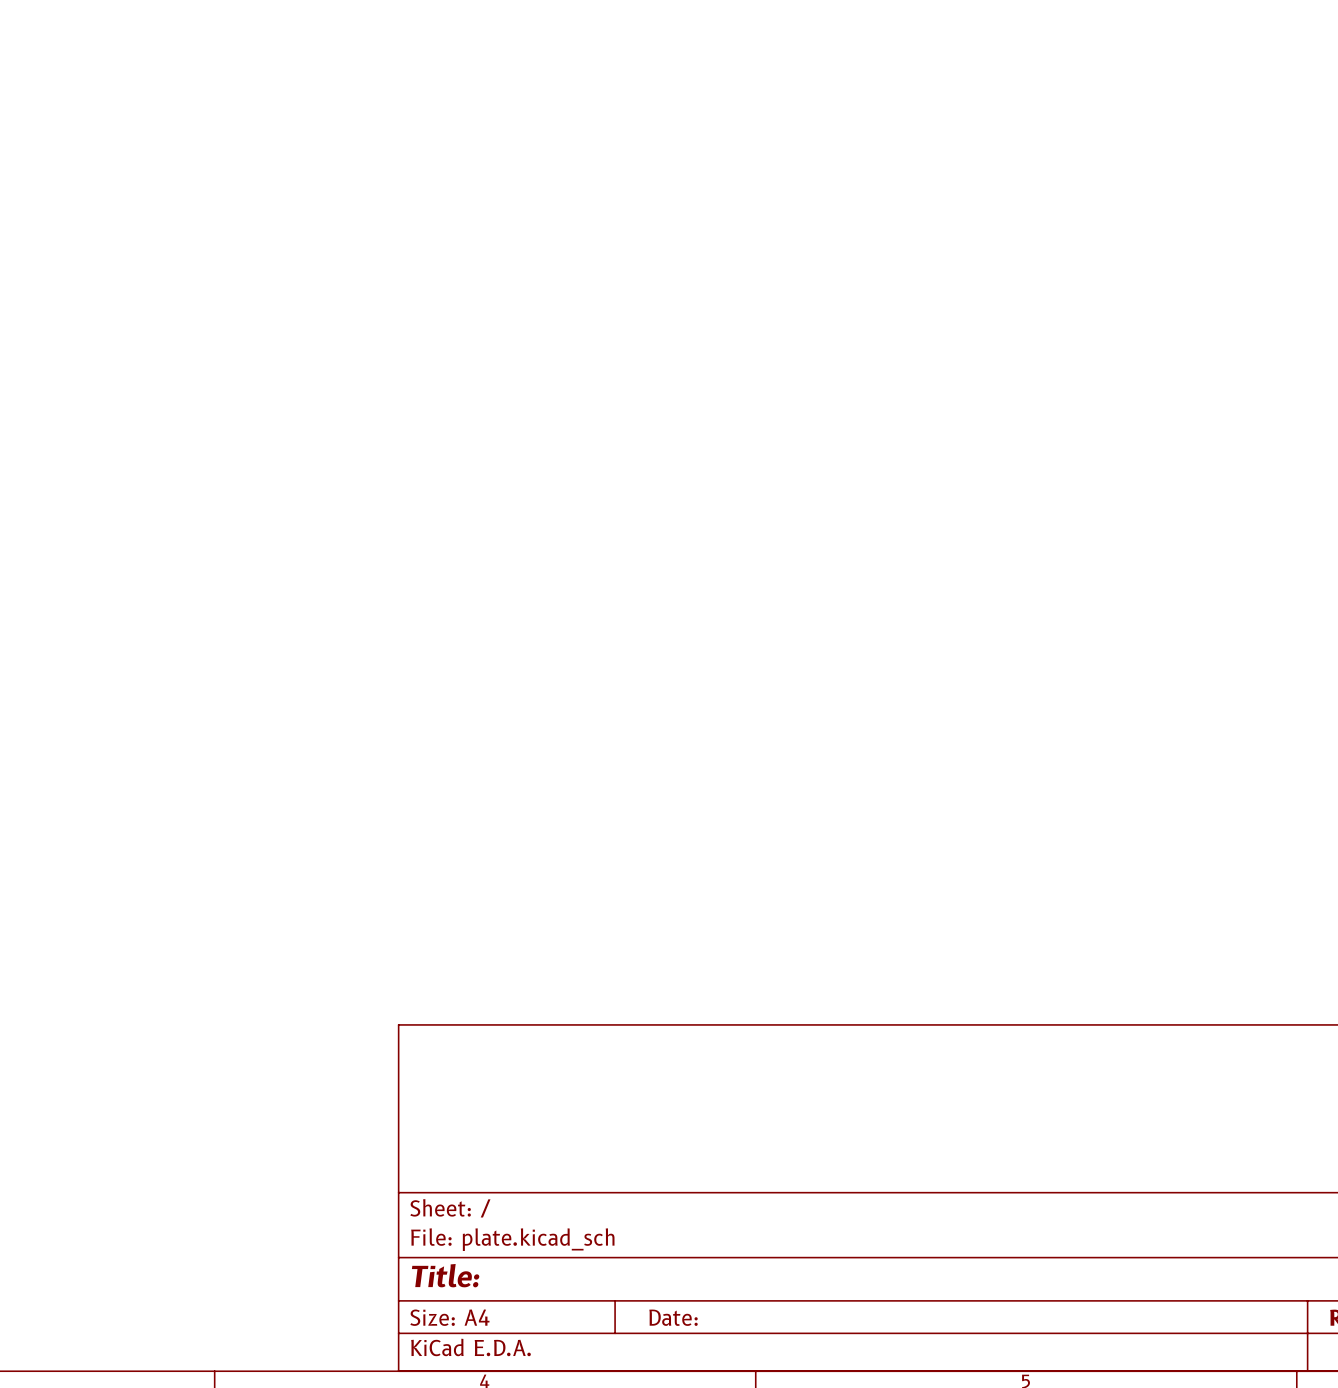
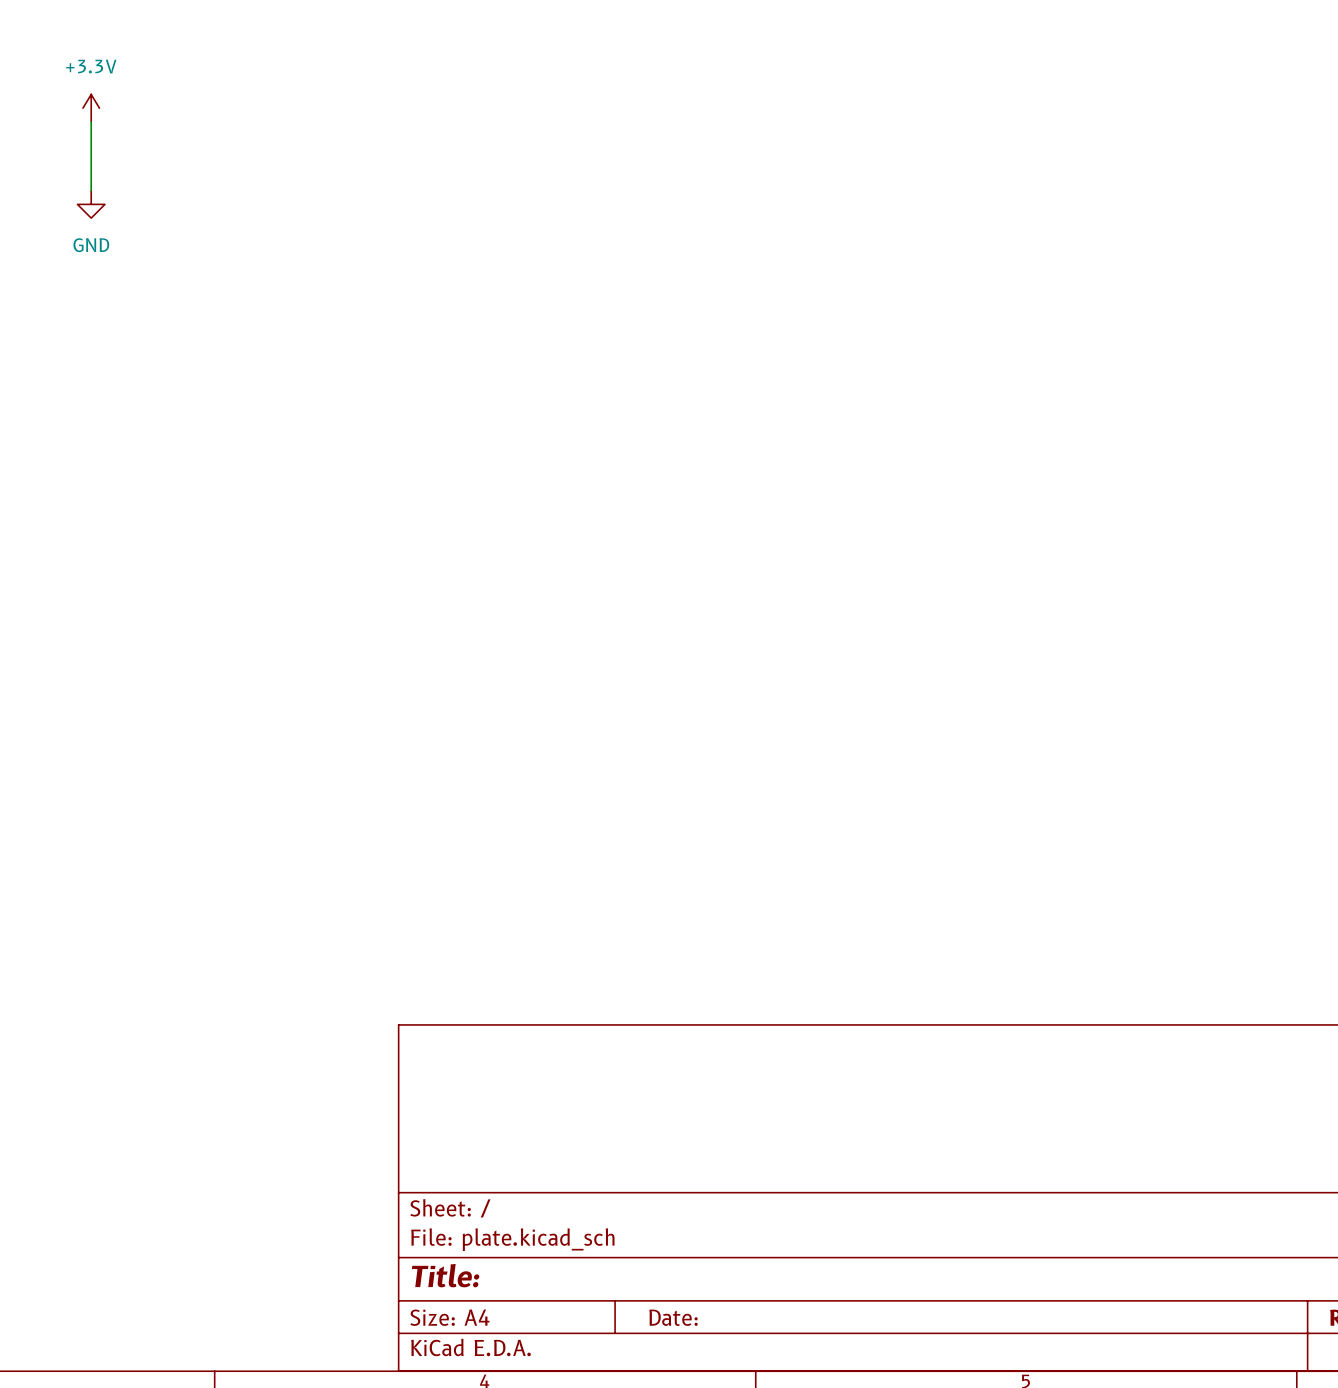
power symbol: none -> +3.3V (91, 108)
wire: none -> (91, 121) (91, 190)
power symbol: none -> GND (91, 204)

